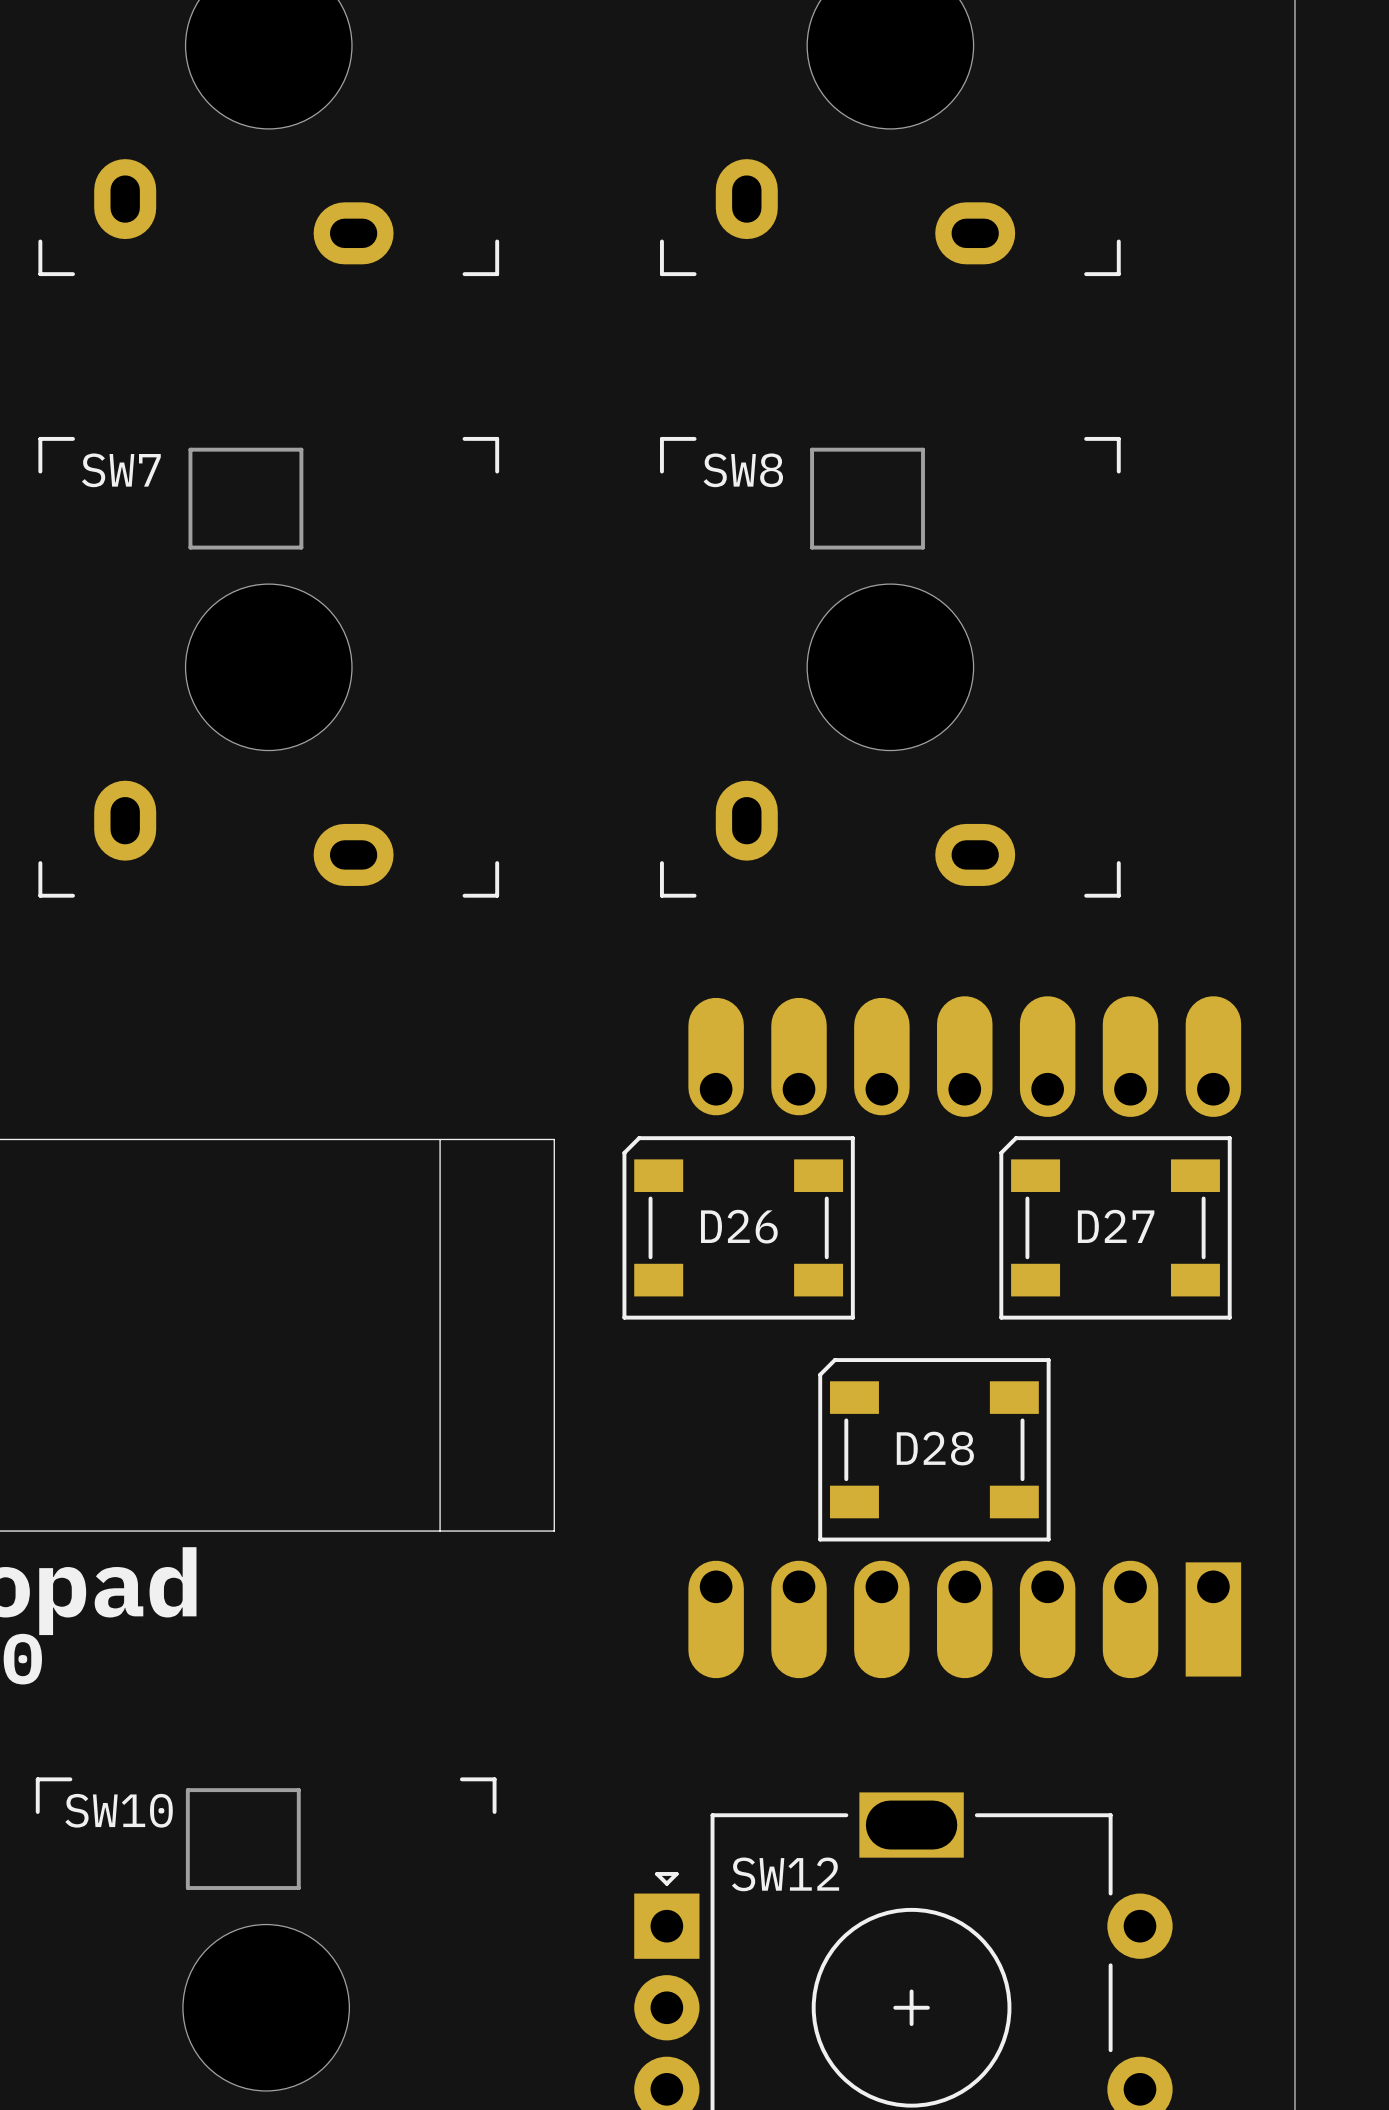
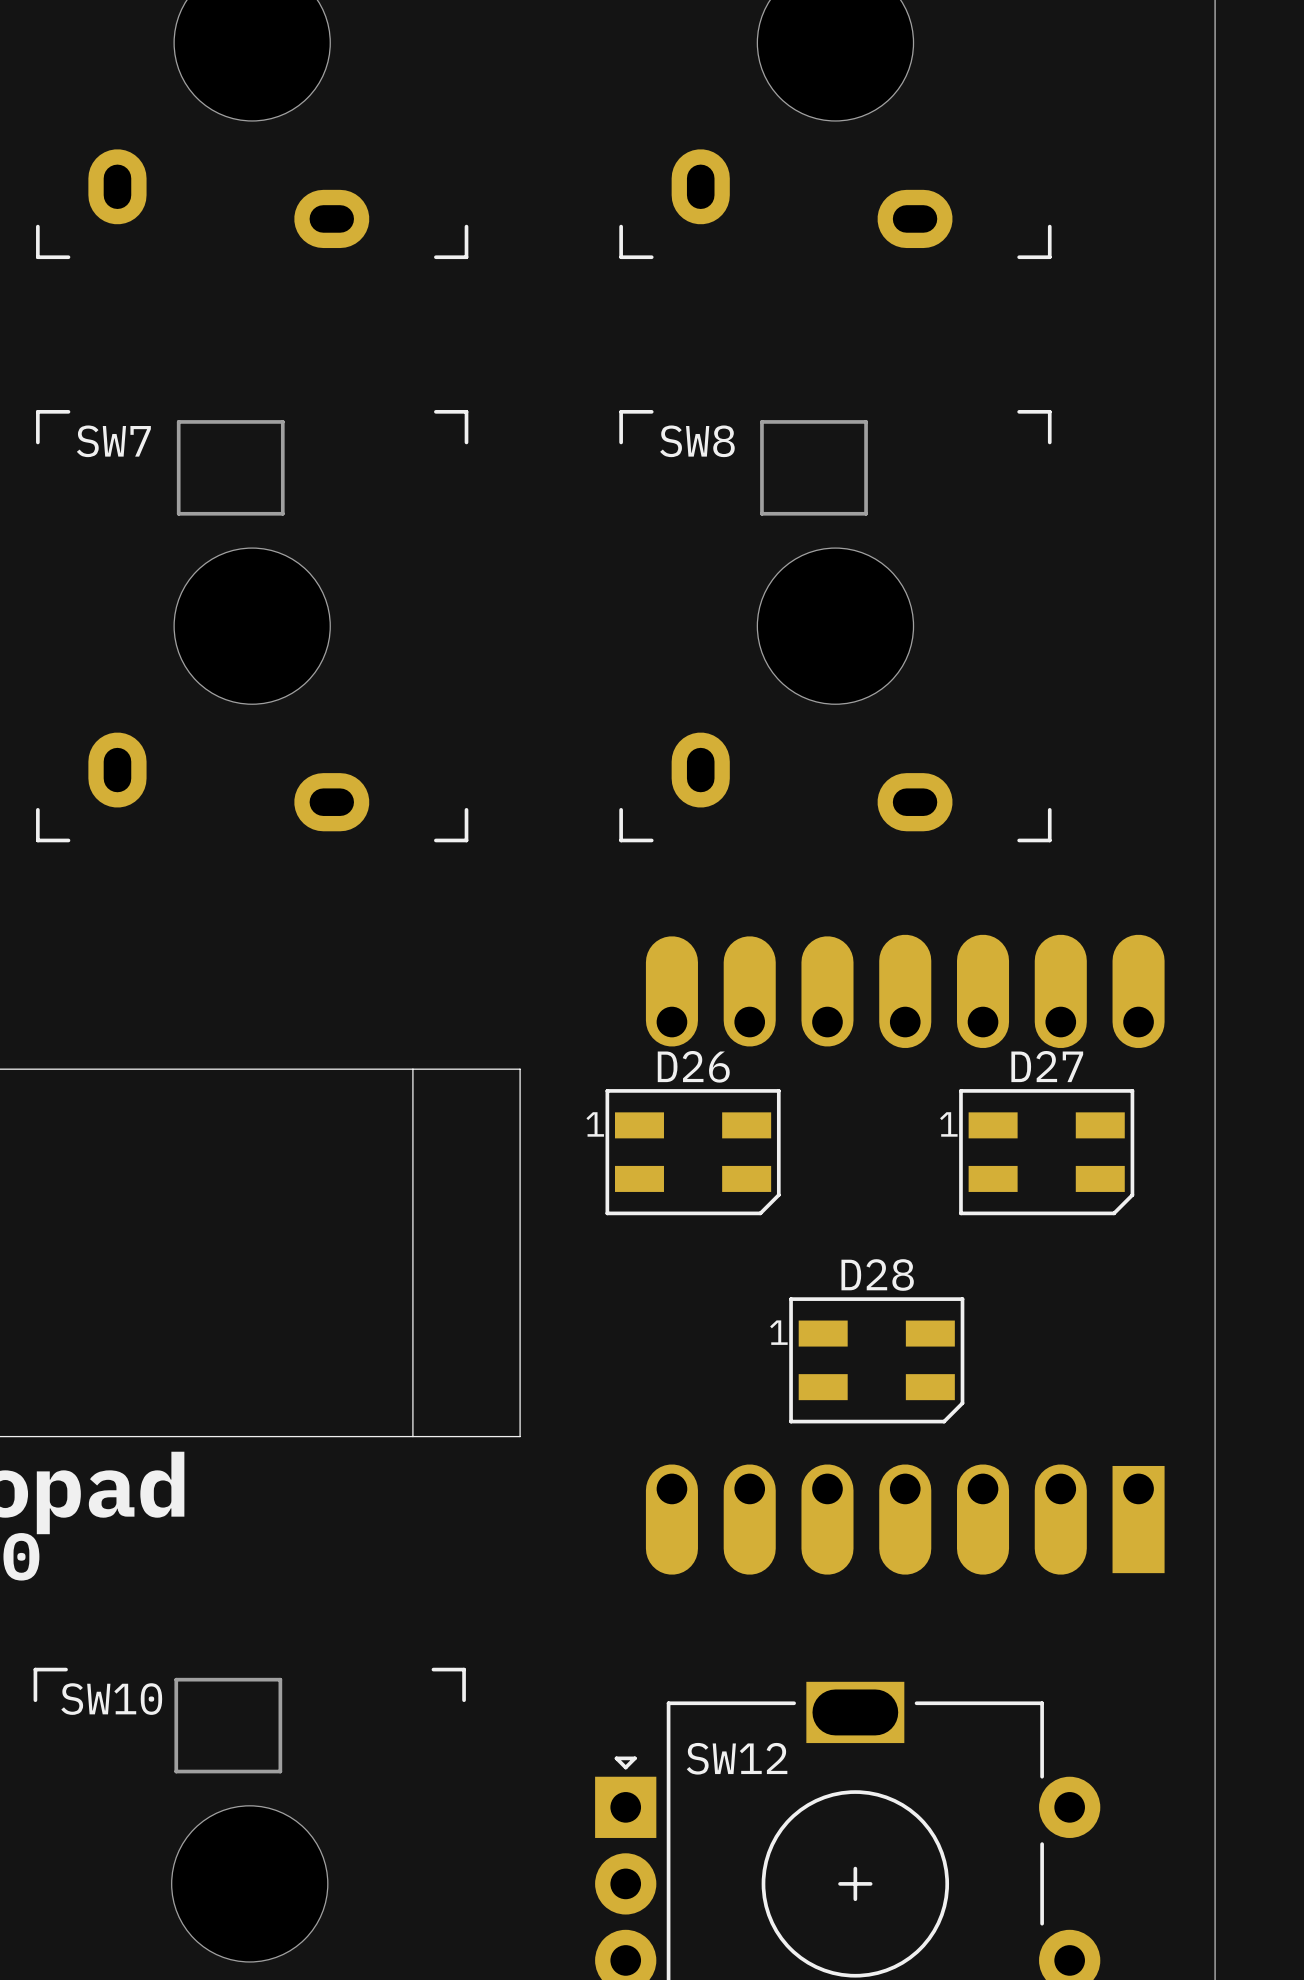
D26 footprint: [622, 1136, 855, 1320] -> [605, 1089, 781, 1216]
D27 footprint: [999, 1136, 1232, 1320] -> [959, 1089, 1135, 1216]
D26 name position: D26 (739, 1226) -> D26 (693, 1066)
D27 name position: D27 (1116, 1226) -> D27 (1047, 1066)
D28 footprint: [818, 1358, 1051, 1542] -> [789, 1297, 965, 1424]
D28 name position: D28 (935, 1448) -> D28 (877, 1275)

